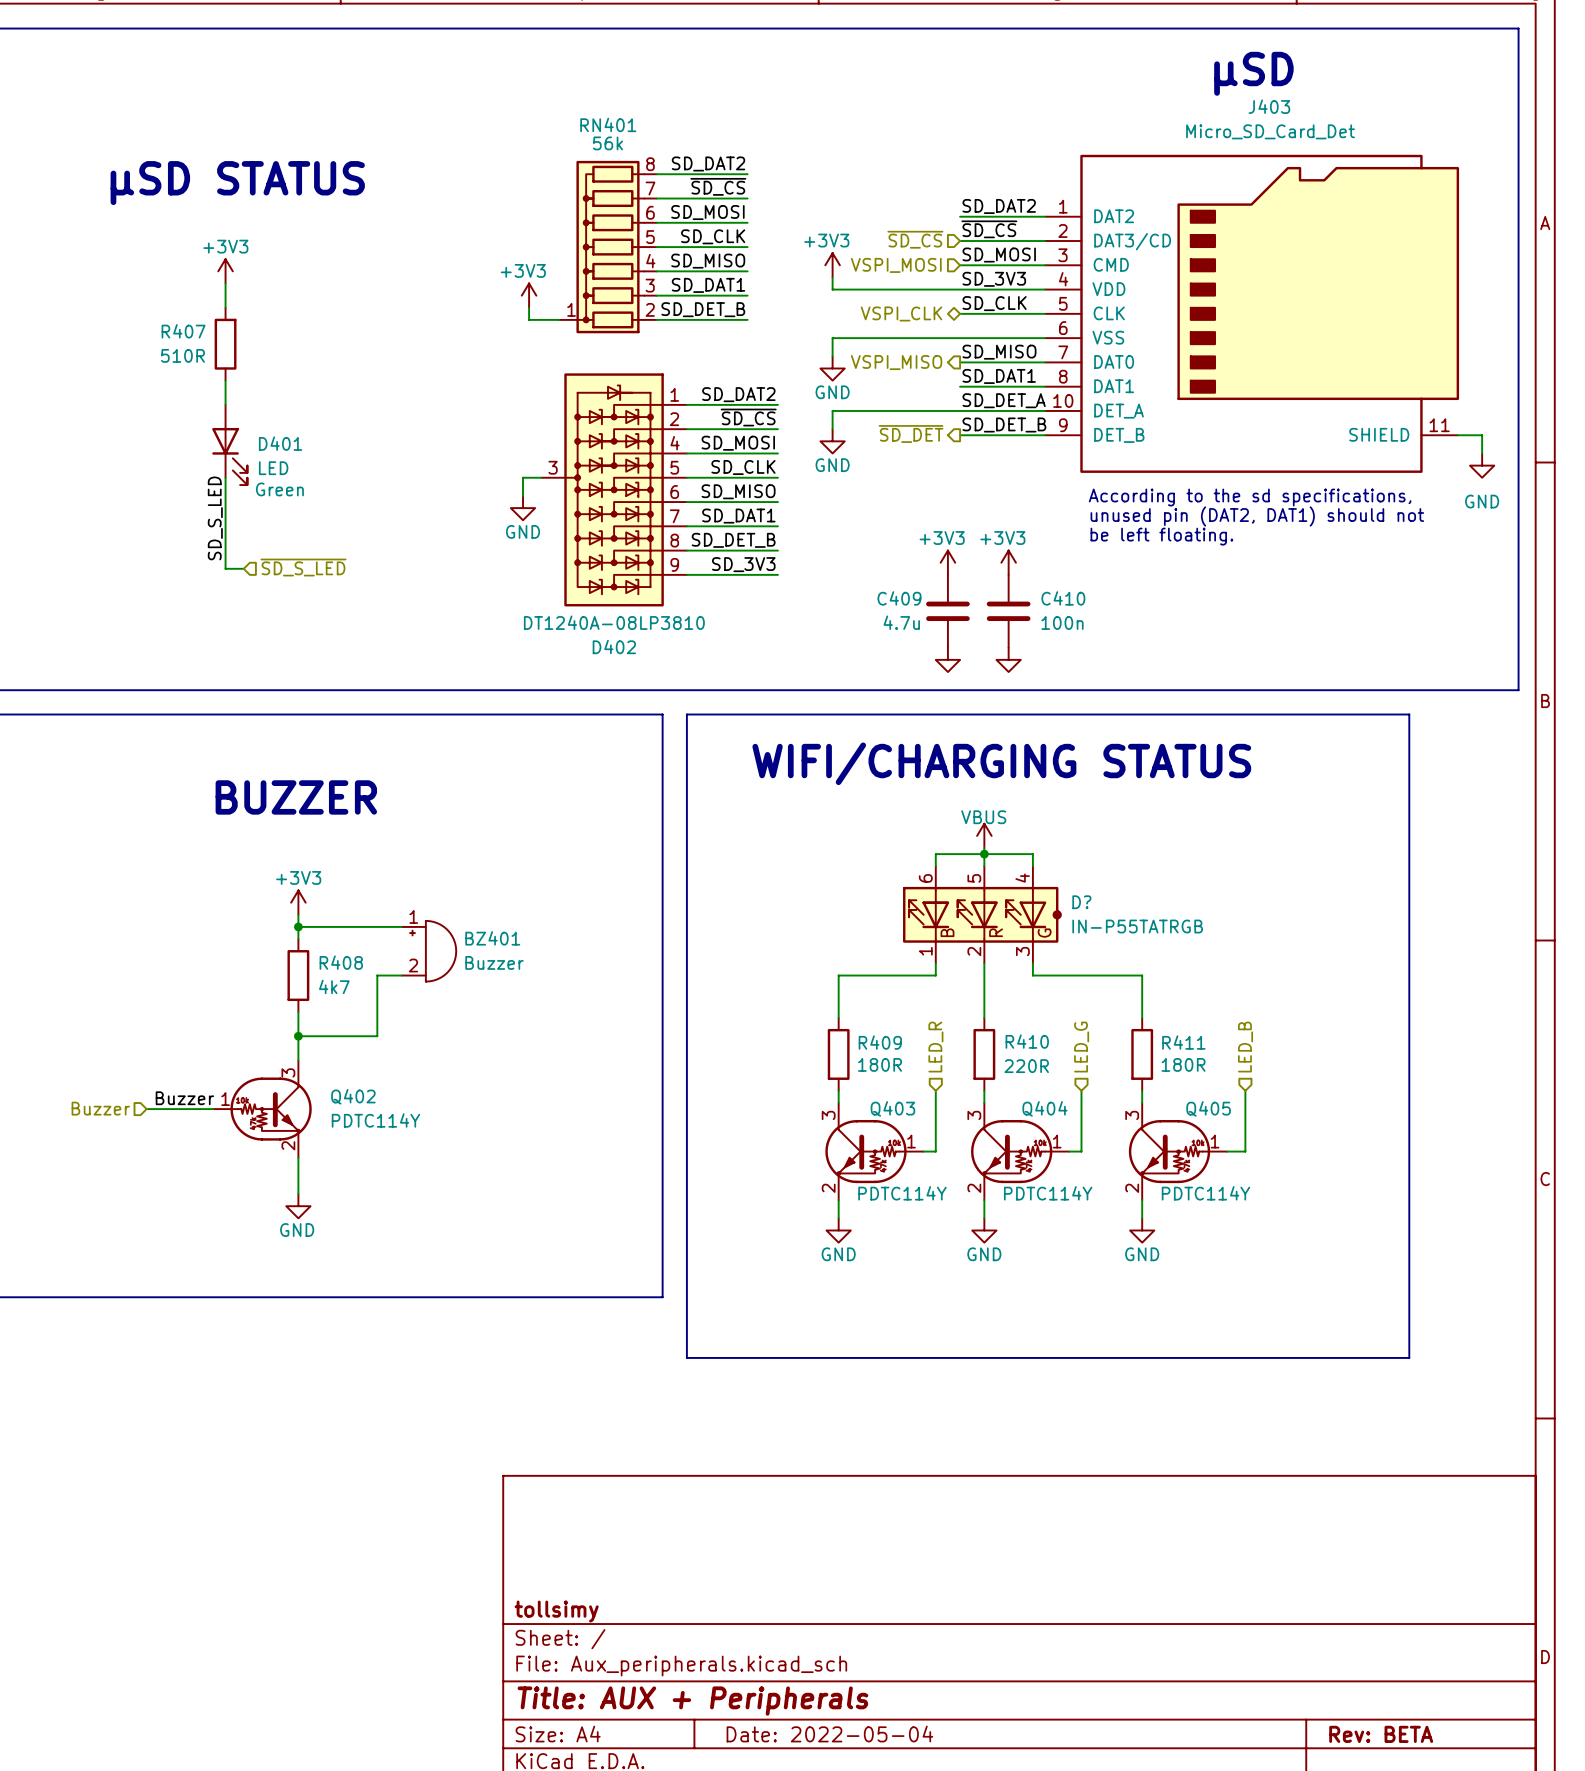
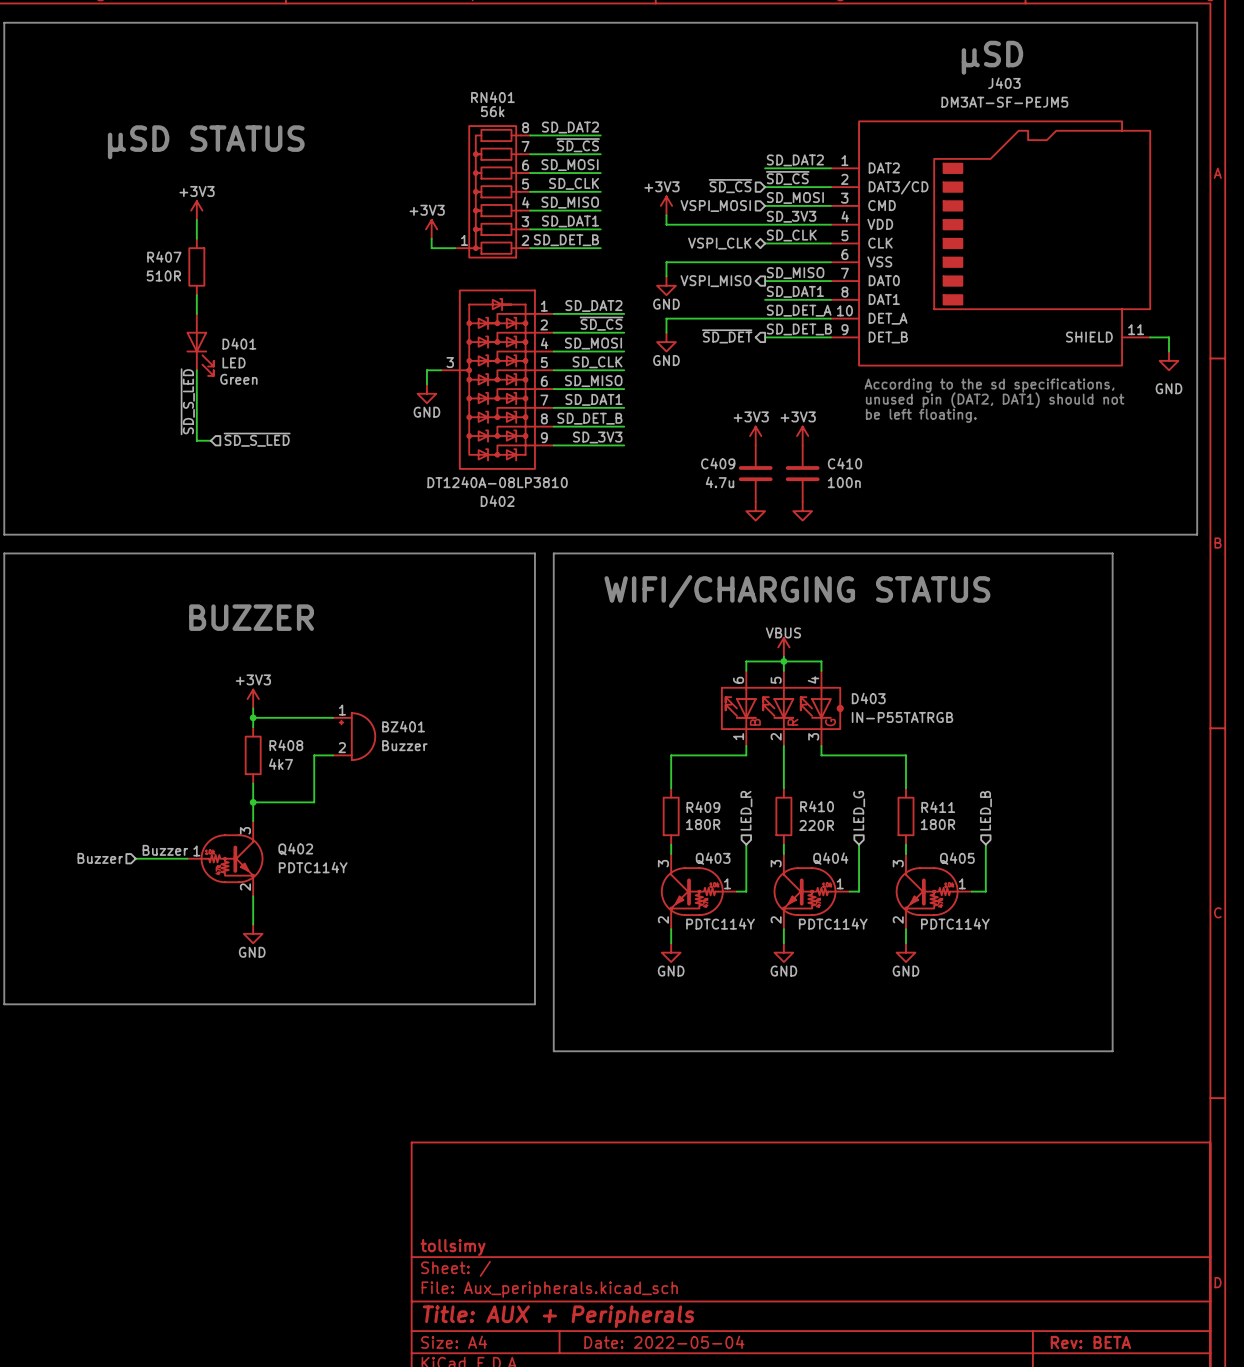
J403 value: Micro_SD_Card_Det (1270, 131) -> DM3AT-SF-PEJM5 (1004, 102)
label: SD_S_LED (215, 518) -> ~{SD_S_LED} (187, 401)
D? name: D? (1081, 902) -> D403 (868, 698)

